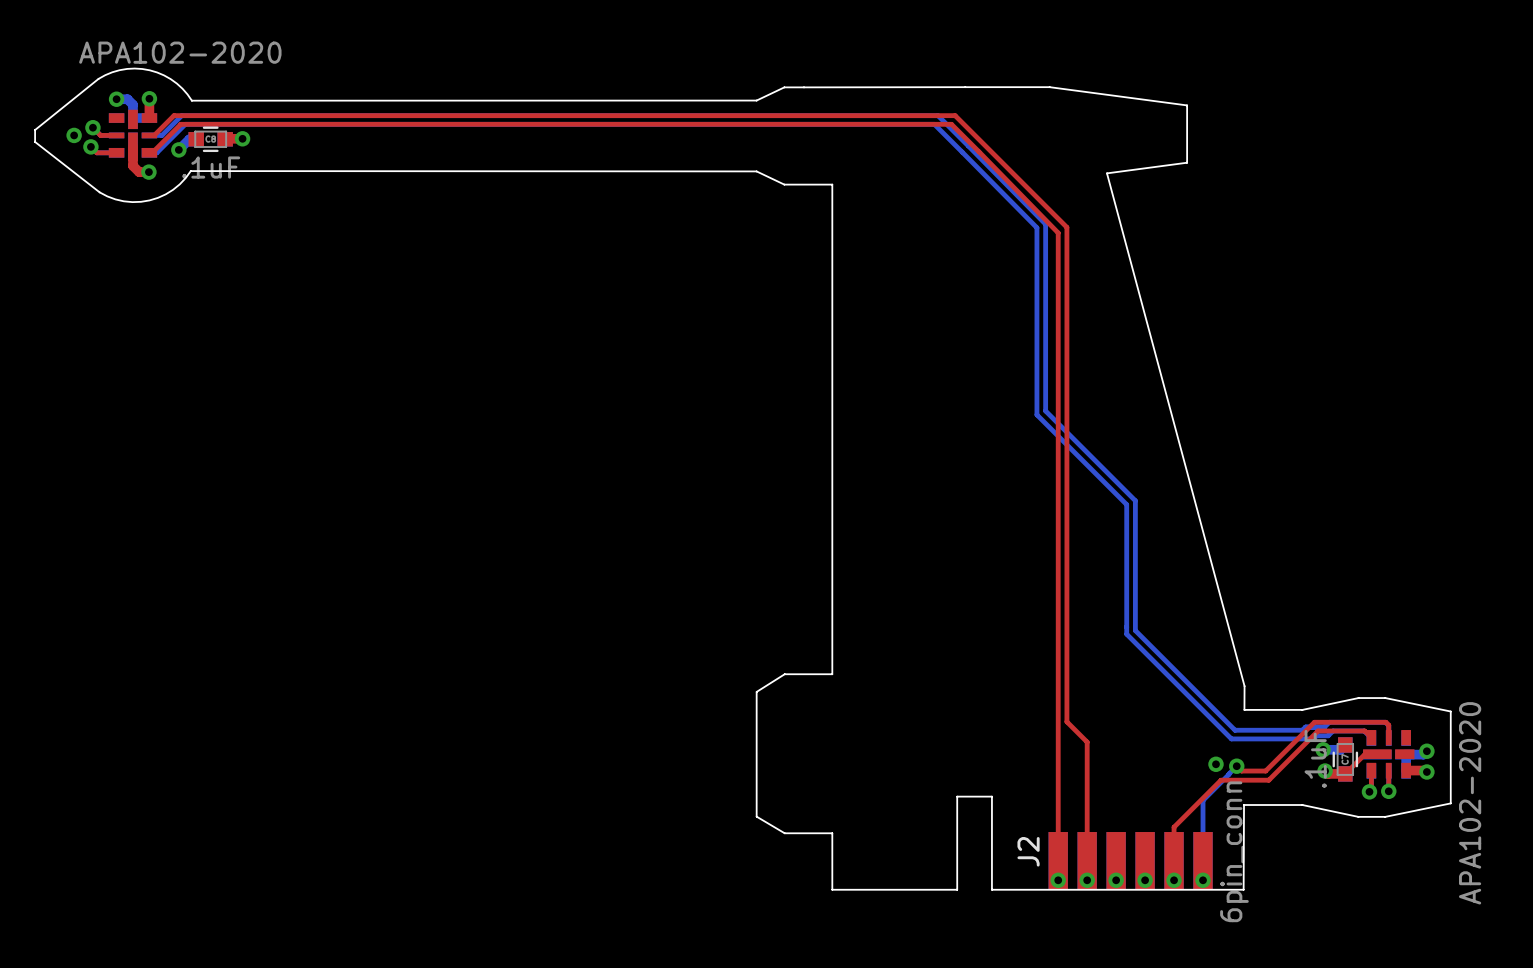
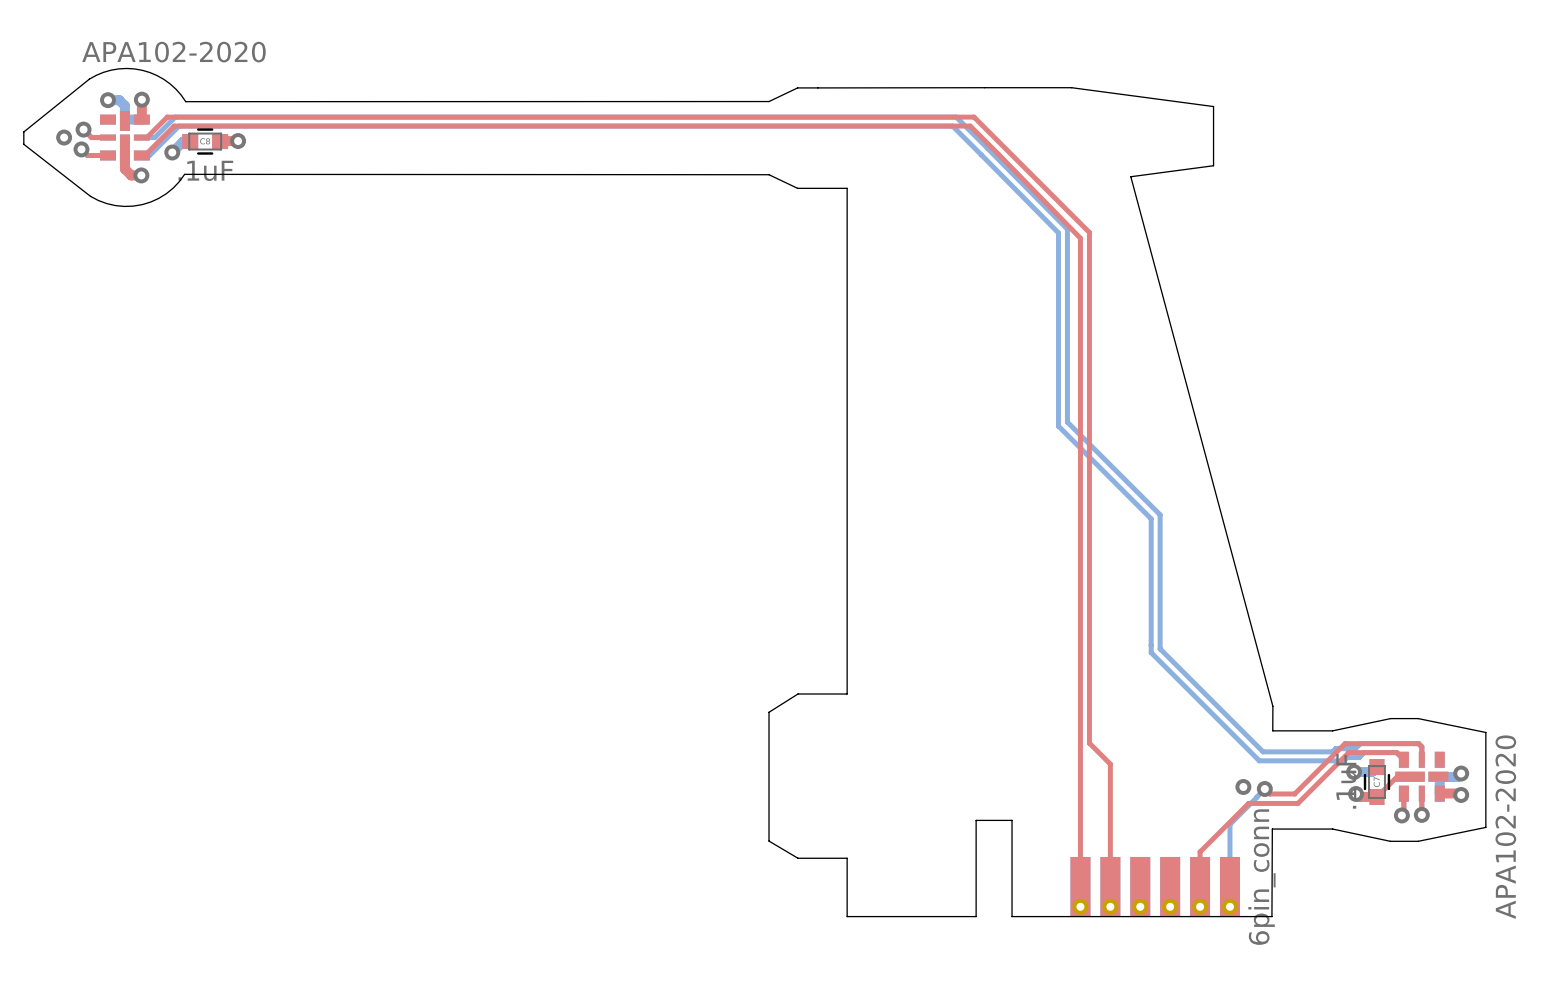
J2 name: J2 (1028, 851) -> none

